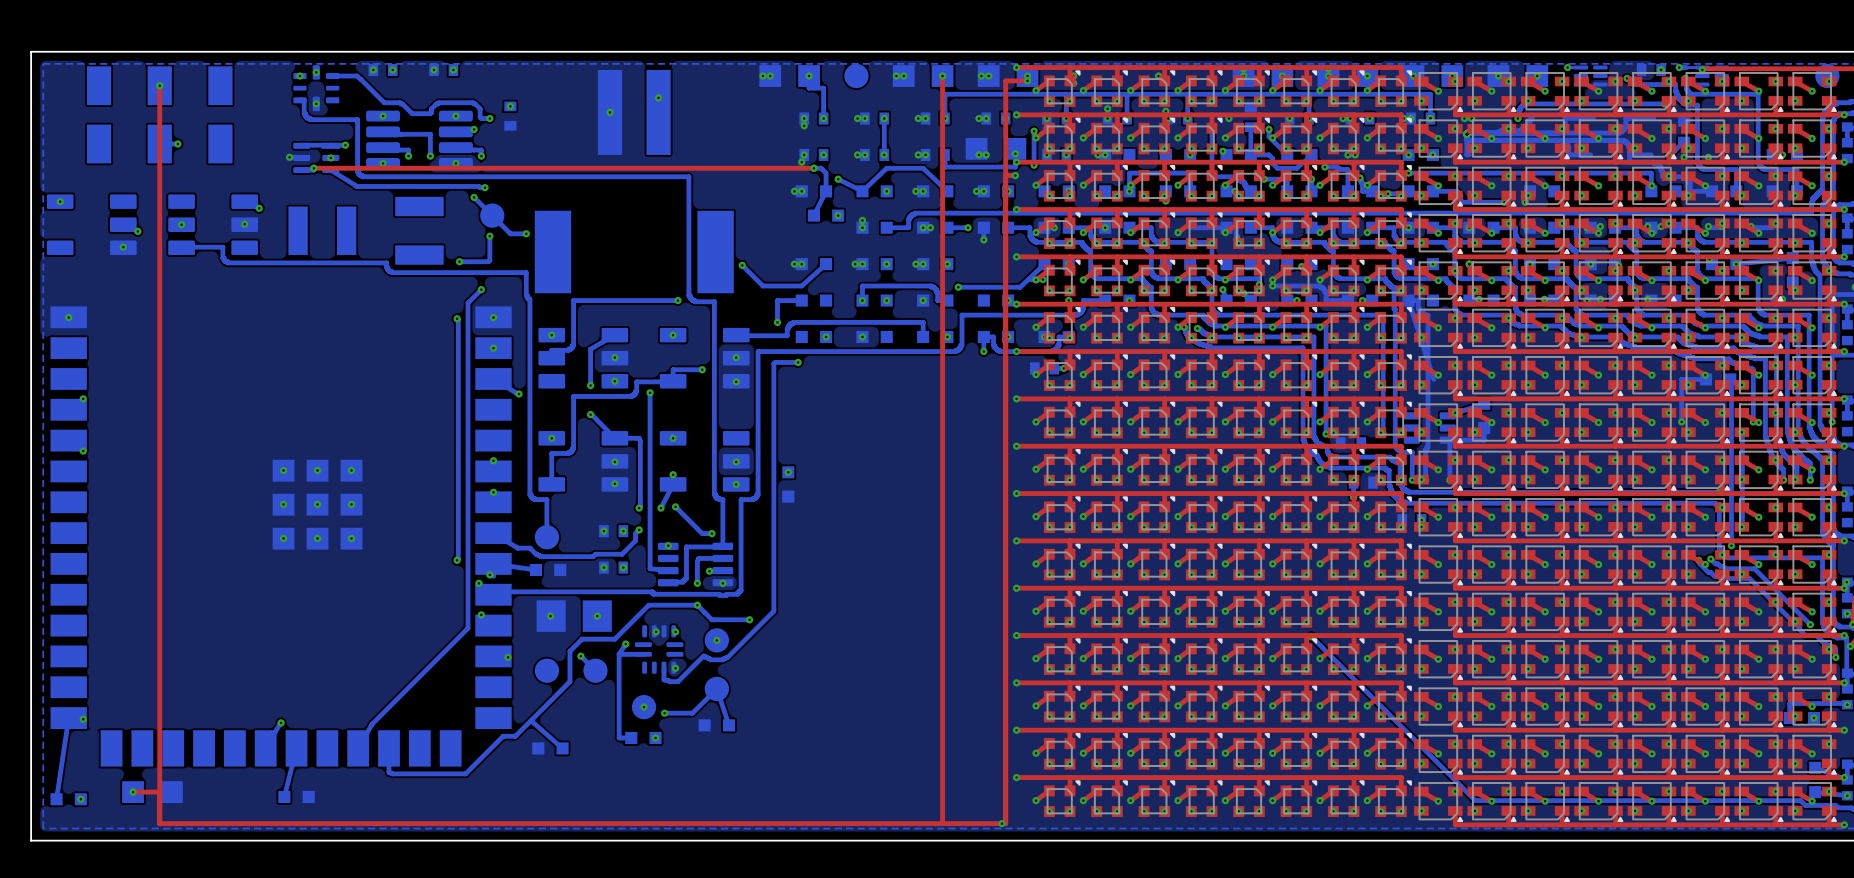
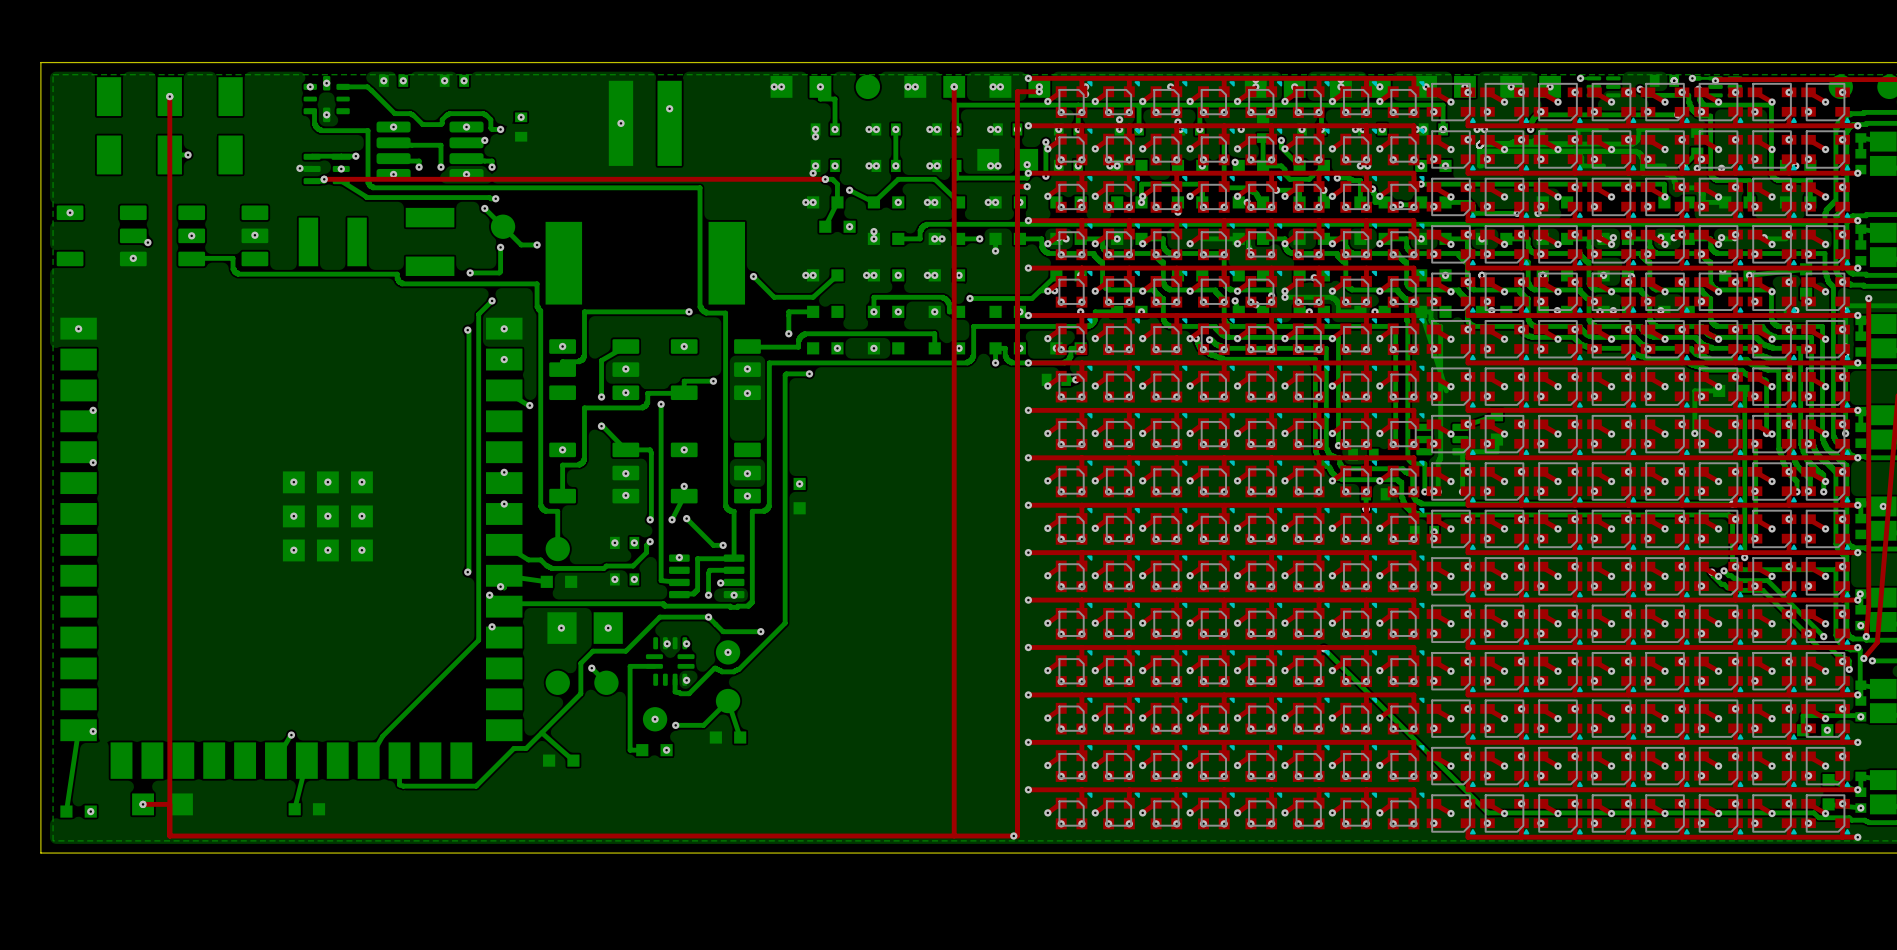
via: (259, 208) -> none
bottom track: (625, 644) (619, 654) -> none
via: (625, 644) -> none
via: (508, 657) -> none

